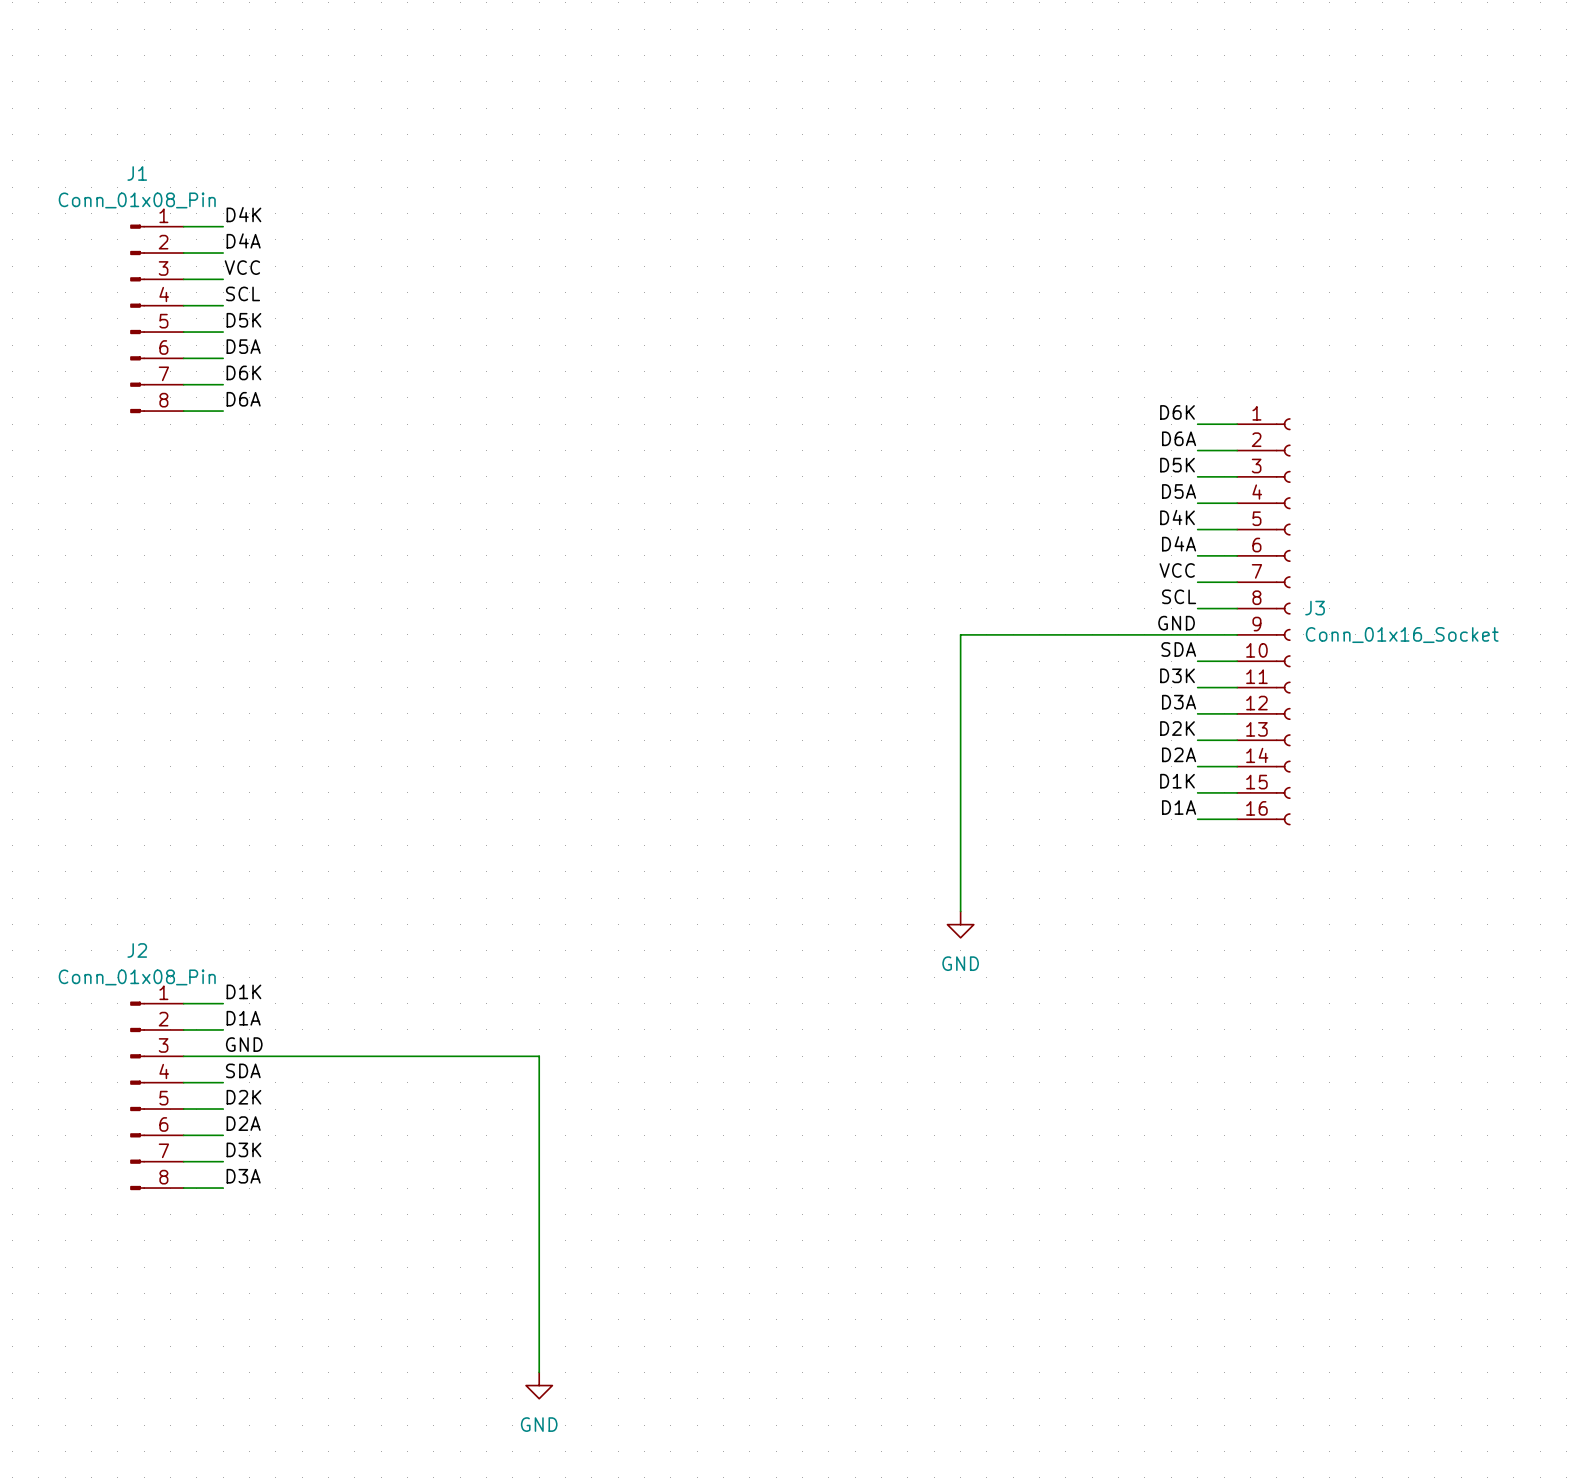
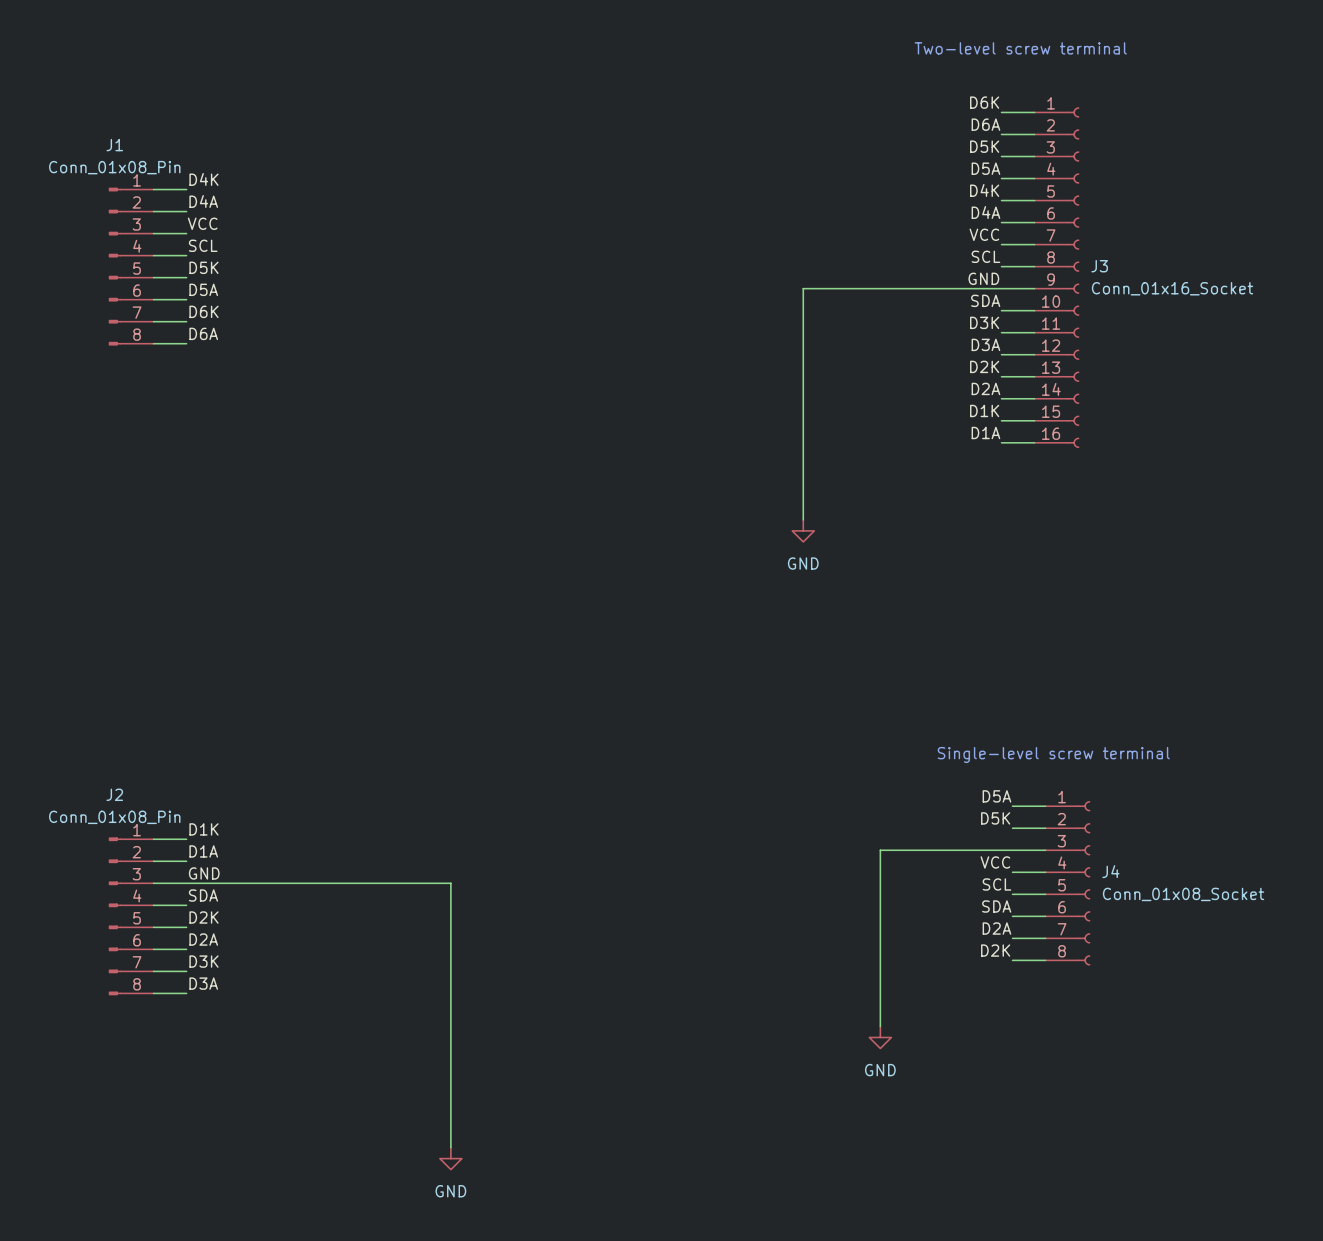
text: none -> Two-level screw terminal (1020, 48)
label: none -> D6K (984, 102)
wire: none -> (1001, 112) (1034, 112)
label: none -> D6A (985, 124)
wire: none -> (1001, 134) (1034, 134)
label: none -> D5K (984, 146)
wire: none -> (1001, 156) (1034, 156)
label: none -> D5A (985, 168)
wire: none -> (1001, 178) (1034, 178)
label: none -> D4K (984, 190)
wire: none -> (1001, 200) (1034, 200)
label: none -> D4A (985, 212)
wire: none -> (1001, 222) (1034, 222)
label: none -> VCC (984, 234)
wire: none -> (1001, 244) (1034, 244)
label: none -> SCL (985, 256)
wire: none -> (1001, 266) (1034, 266)
label: none -> GND (983, 278)
wire: none -> (1034, 288) (803, 288) (803, 519)
label: none -> SDA (985, 300)
label: none -> D3K (984, 322)
label: D6K (1177, 412) -> D3A (985, 344)
label: D6A (1179, 438) -> D2K (984, 366)
label: D5K (1177, 465) -> D2A (985, 388)
label: D5A (1179, 491) -> D1K (984, 410)
label: D4K (1177, 517) -> D1A (985, 432)
label: D4A (1179, 543) -> none
wire: (1197, 555) (1237, 555) -> (1001, 310) (1034, 310)
label: VCC (1177, 570) -> none
wire: (1197, 582) (1237, 582) -> (1001, 332) (1034, 332)
label: SCL (1179, 596) -> none
wire: (1197, 608) (1237, 608) -> none
J3 position: (1263, 621) -> (1056, 277)
label: GND (1176, 623) -> none
power symbol: none -> GND (803, 530)
wire: (1237, 634) (960, 634) (960, 911) -> none
label: SDA (1178, 649) -> none
wire: (1197, 661) (1237, 661) -> none
label: D3K (1177, 675) -> none
wire: (1197, 687) (1237, 687) -> none
label: D3A (1179, 702) -> none
wire: (1197, 713) (1237, 713) -> (1012, 806) (1045, 806)
label: D2K (1177, 728) -> none
wire: (1197, 740) (1237, 740) -> (1012, 828) (1045, 828)
label: D2A (1179, 754) -> none
wire: (1197, 766) (1237, 766) -> none
label: D1K (1177, 781) -> none
wire: (1197, 792) (1237, 792) -> (1012, 872) (1045, 872)
label: D1A (1179, 807) -> none
wire: (1197, 819) (1237, 819) -> (1012, 894) (1045, 894)
text: none -> Single-level screw terminal (1053, 754)
power symbol: GND (960, 924) -> none
label: none -> D5A (996, 796)
label: none -> D5K (995, 818)
wire: none -> (1045, 850) (880, 850) (880, 1026)
label: none -> VCC (995, 862)
J4: none -> Conn_01x08_Socket (1067, 883)
label: none -> SCL (996, 884)
label: none -> SDA (996, 906)
wire: none -> (1012, 916) (1045, 916)
label: none -> D2A (996, 928)
wire: none -> (1012, 938) (1045, 938)
label: none -> D2K (995, 950)
wire: none -> (1012, 960) (1045, 960)
power symbol: none -> GND (880, 1037)

